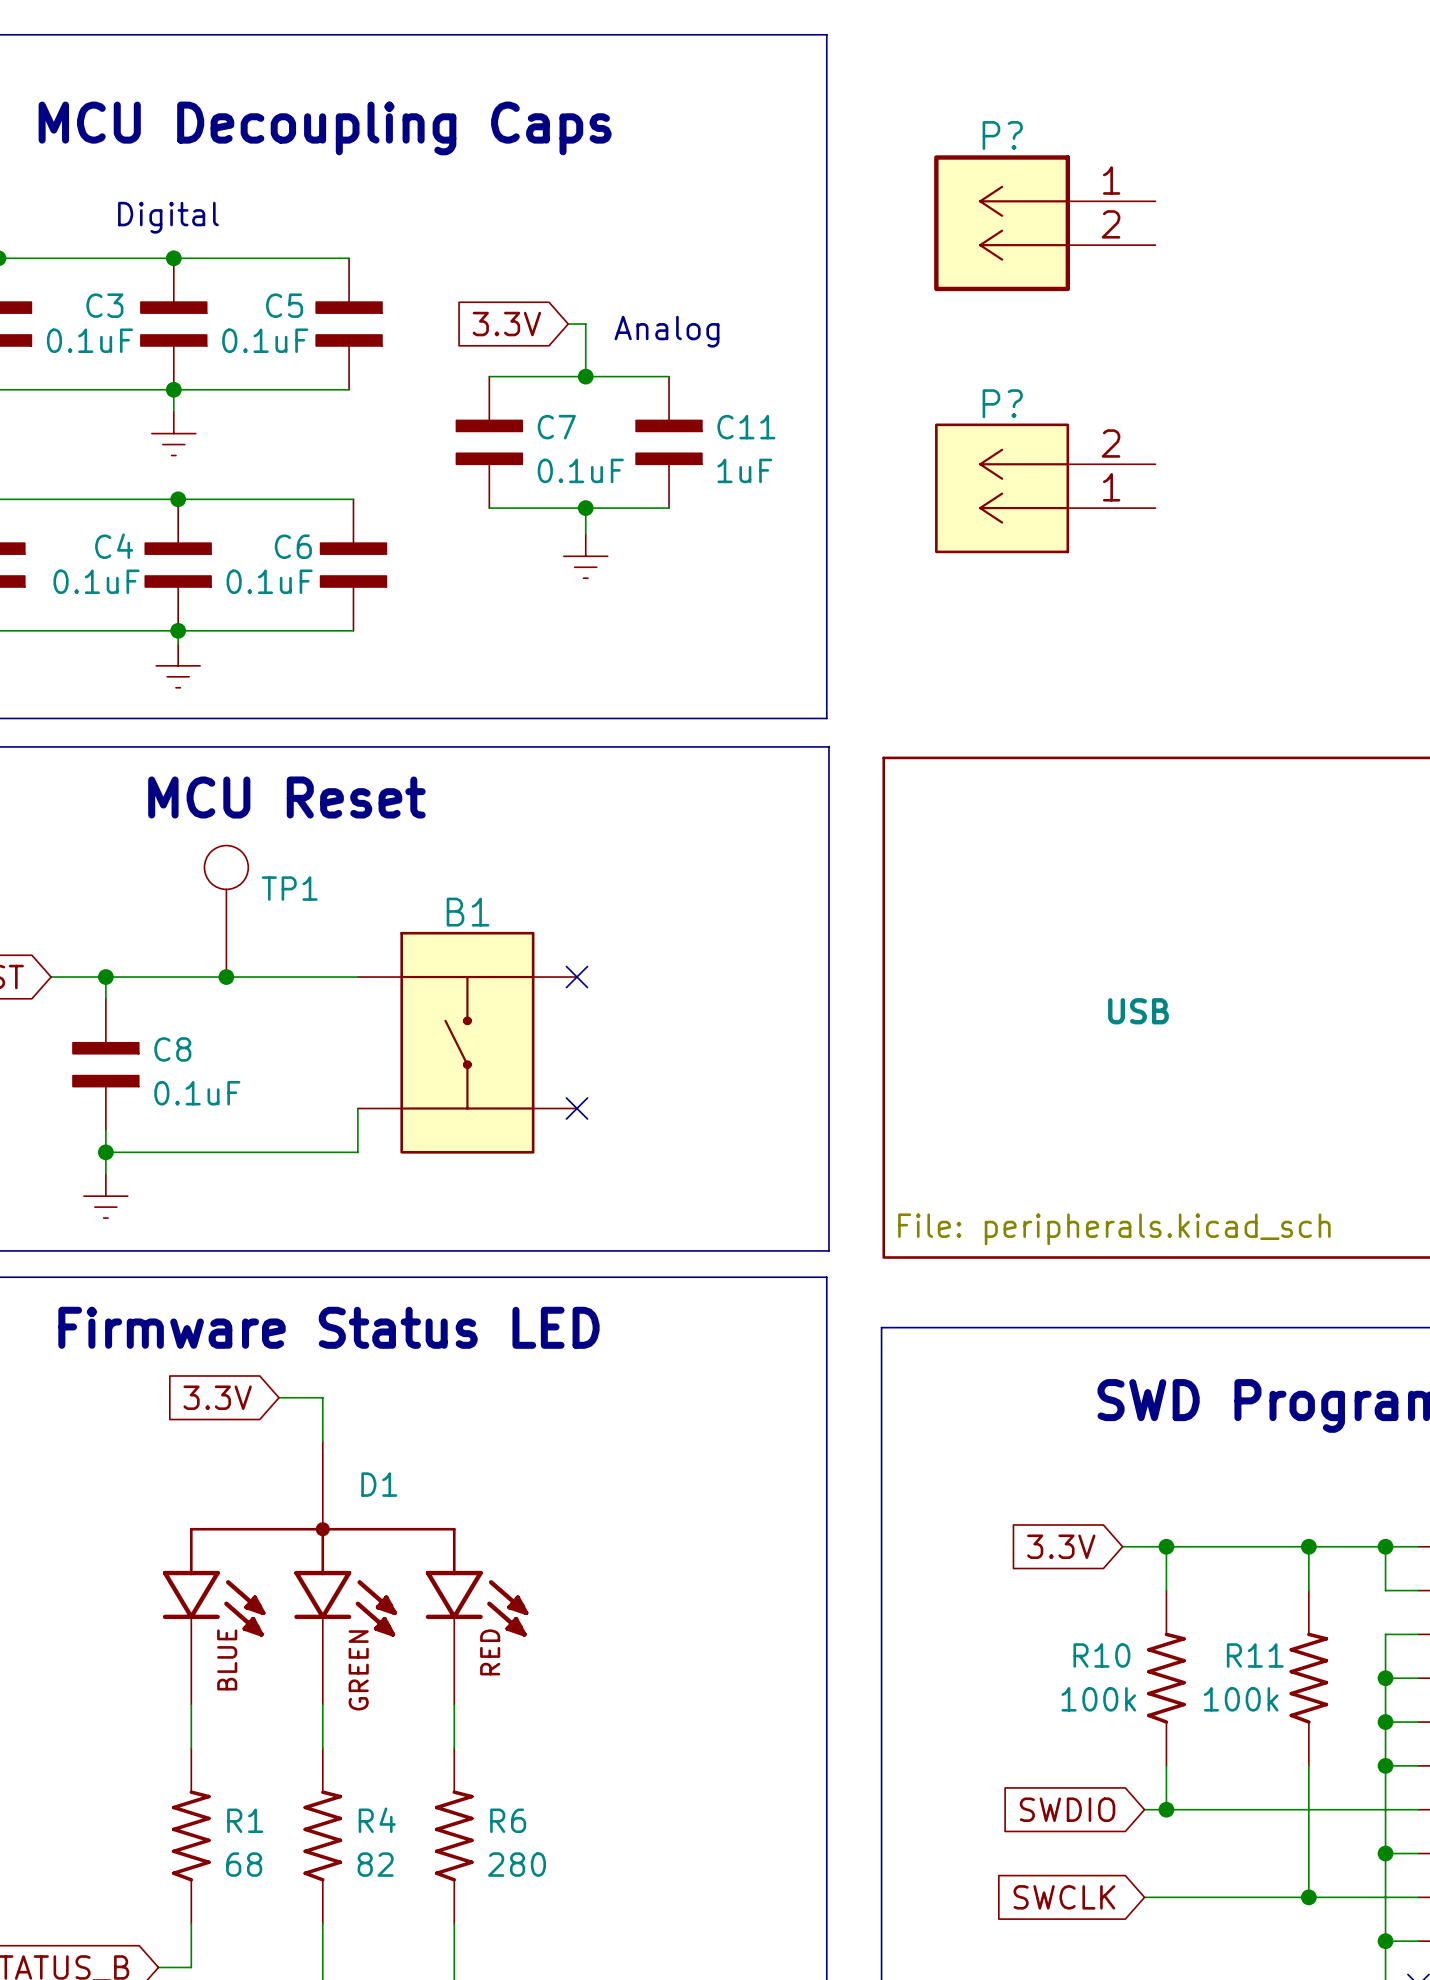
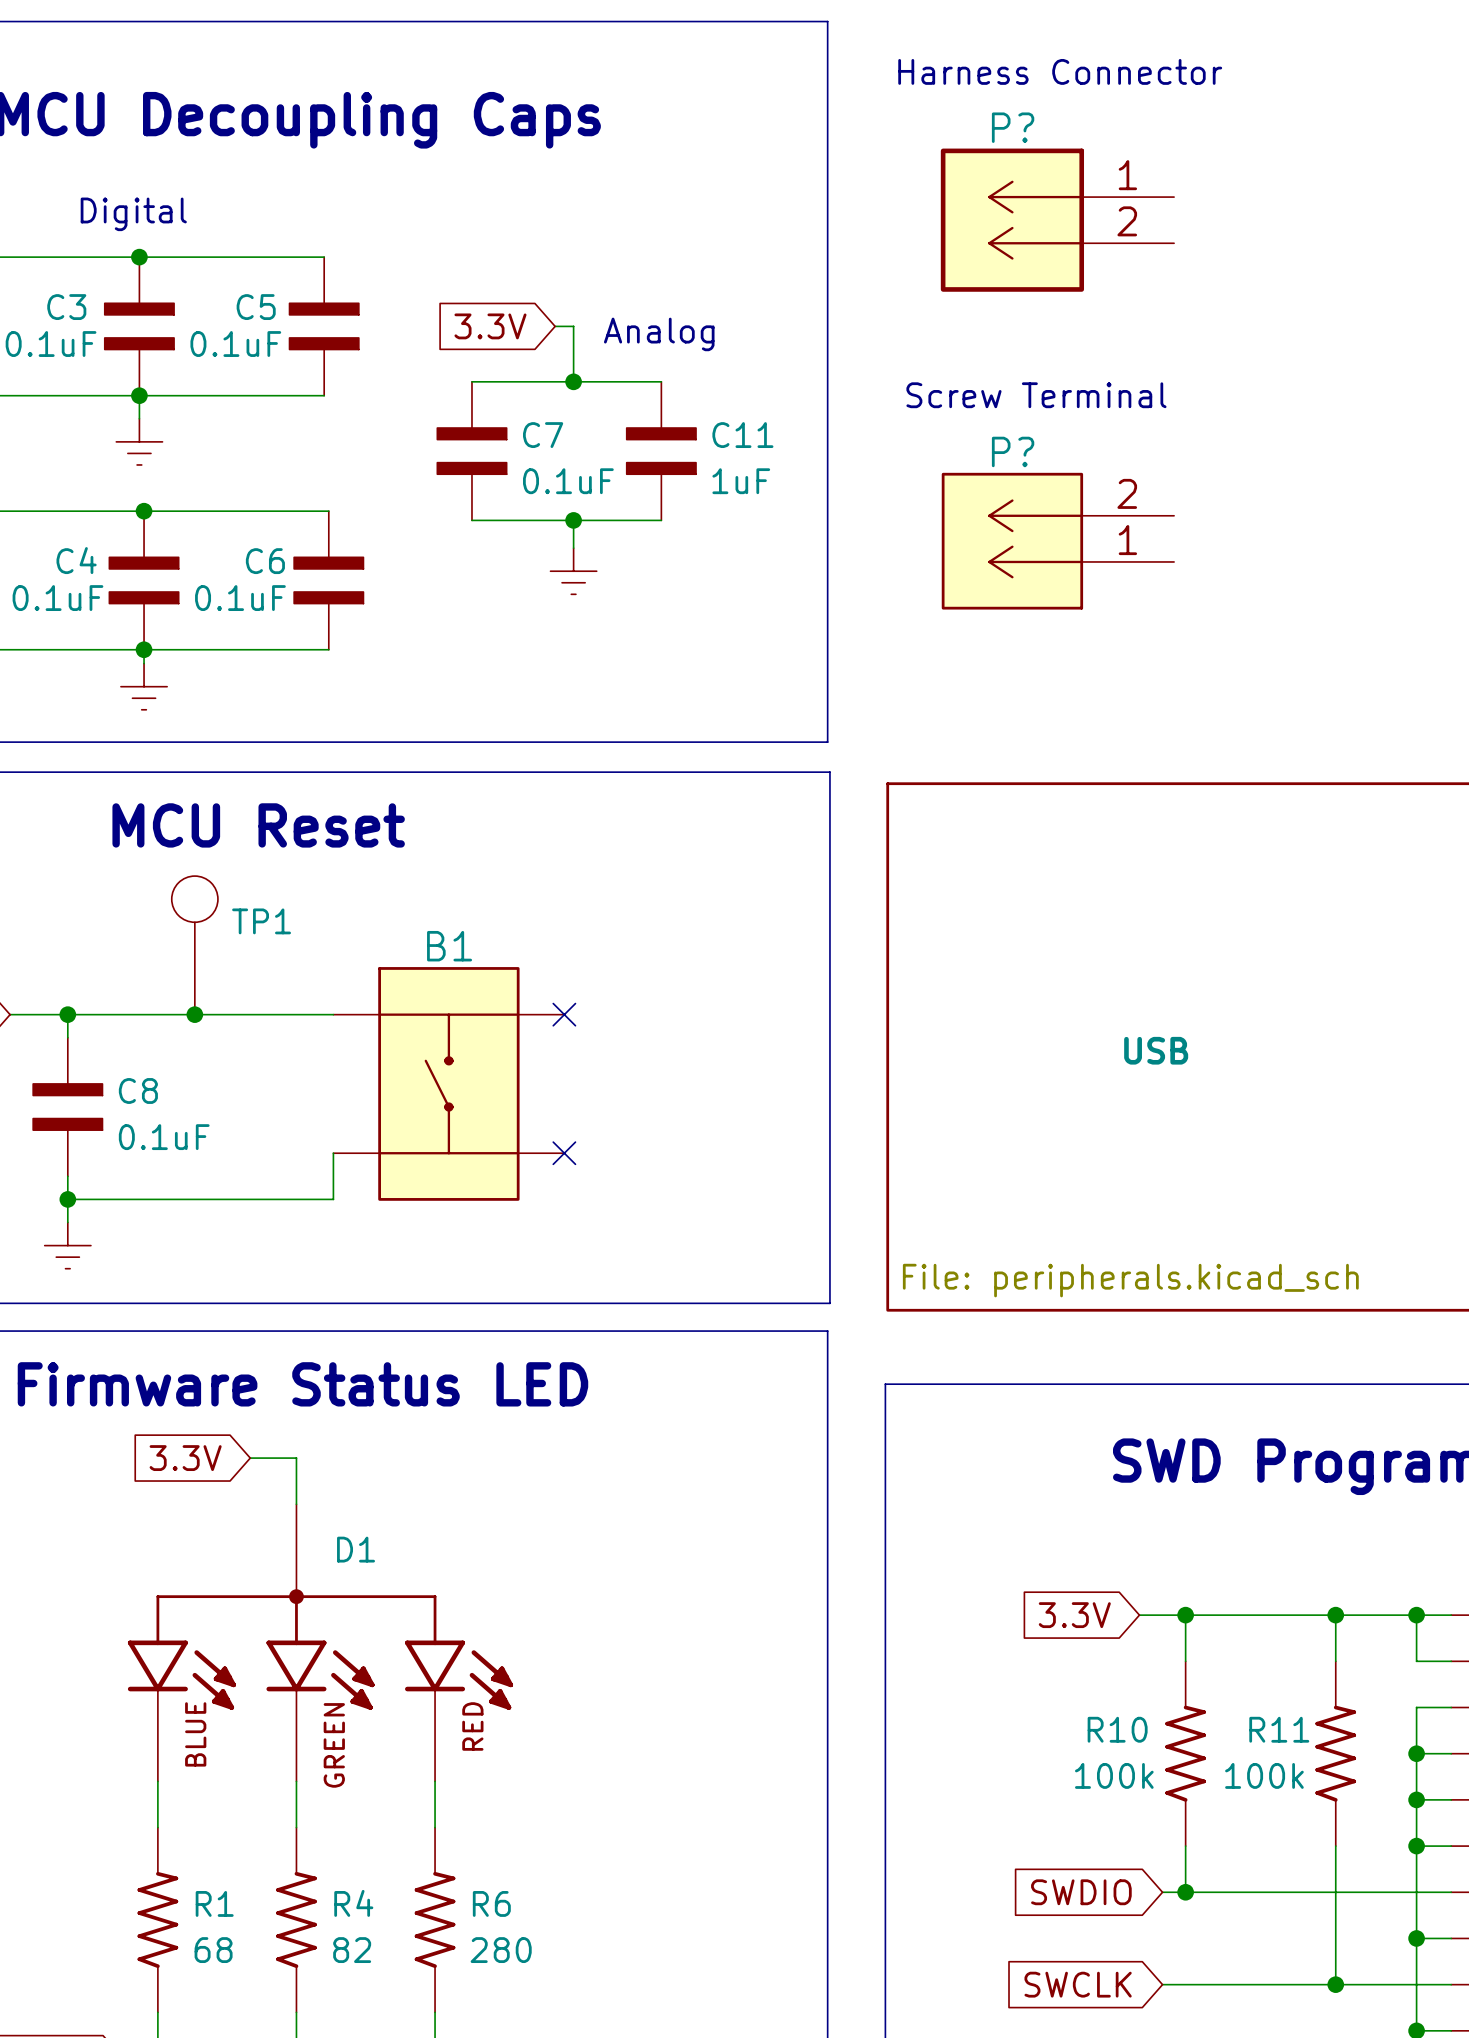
text: none -> Harness Connector (1060, 71)
text: none -> Screw Terminal (1036, 395)
P? position: (1045, 488) -> (1057, 541)

